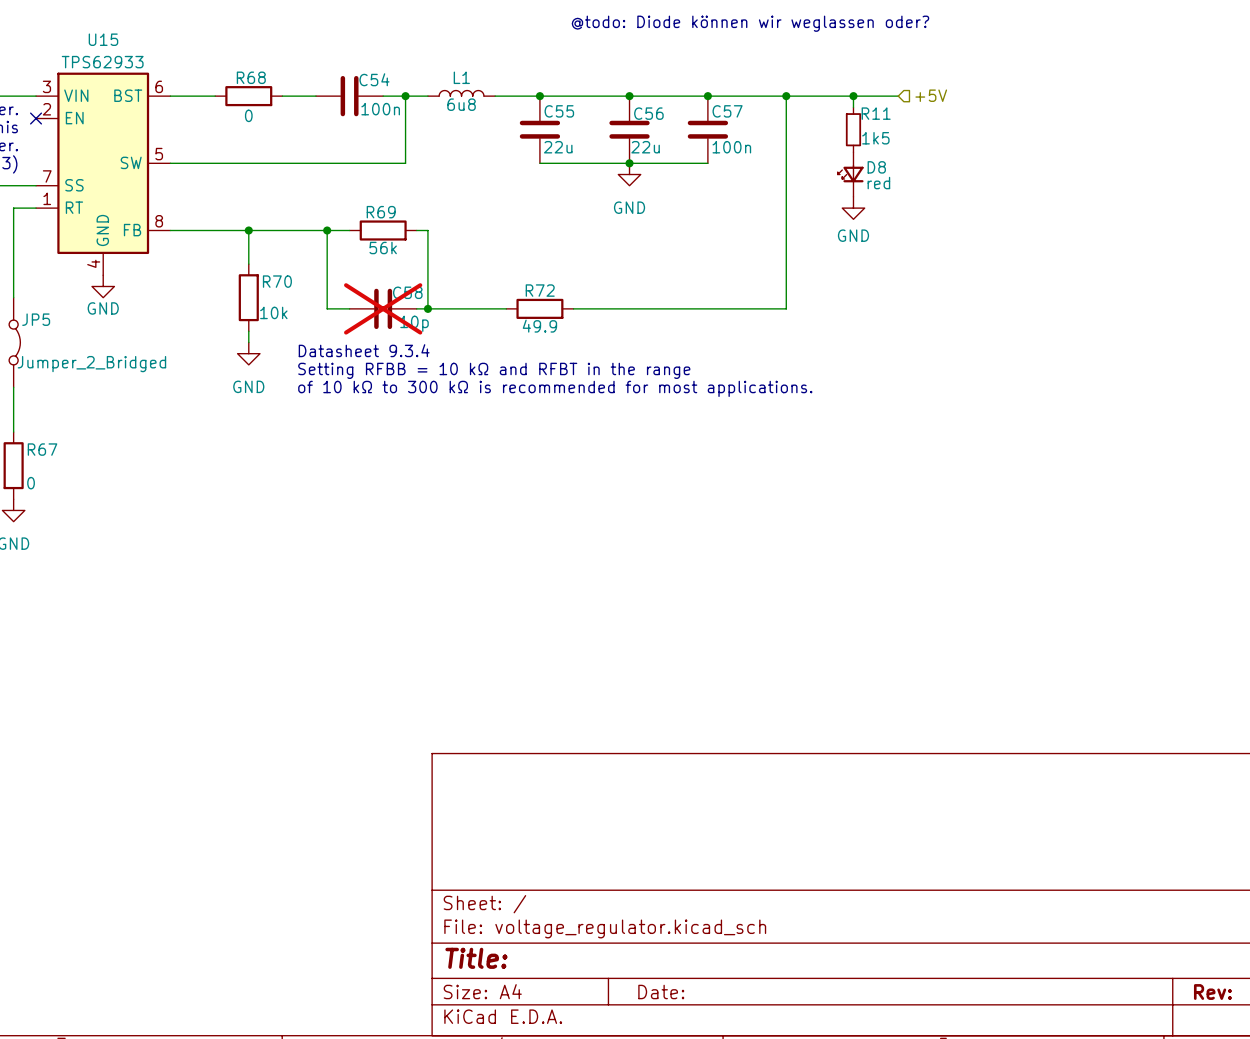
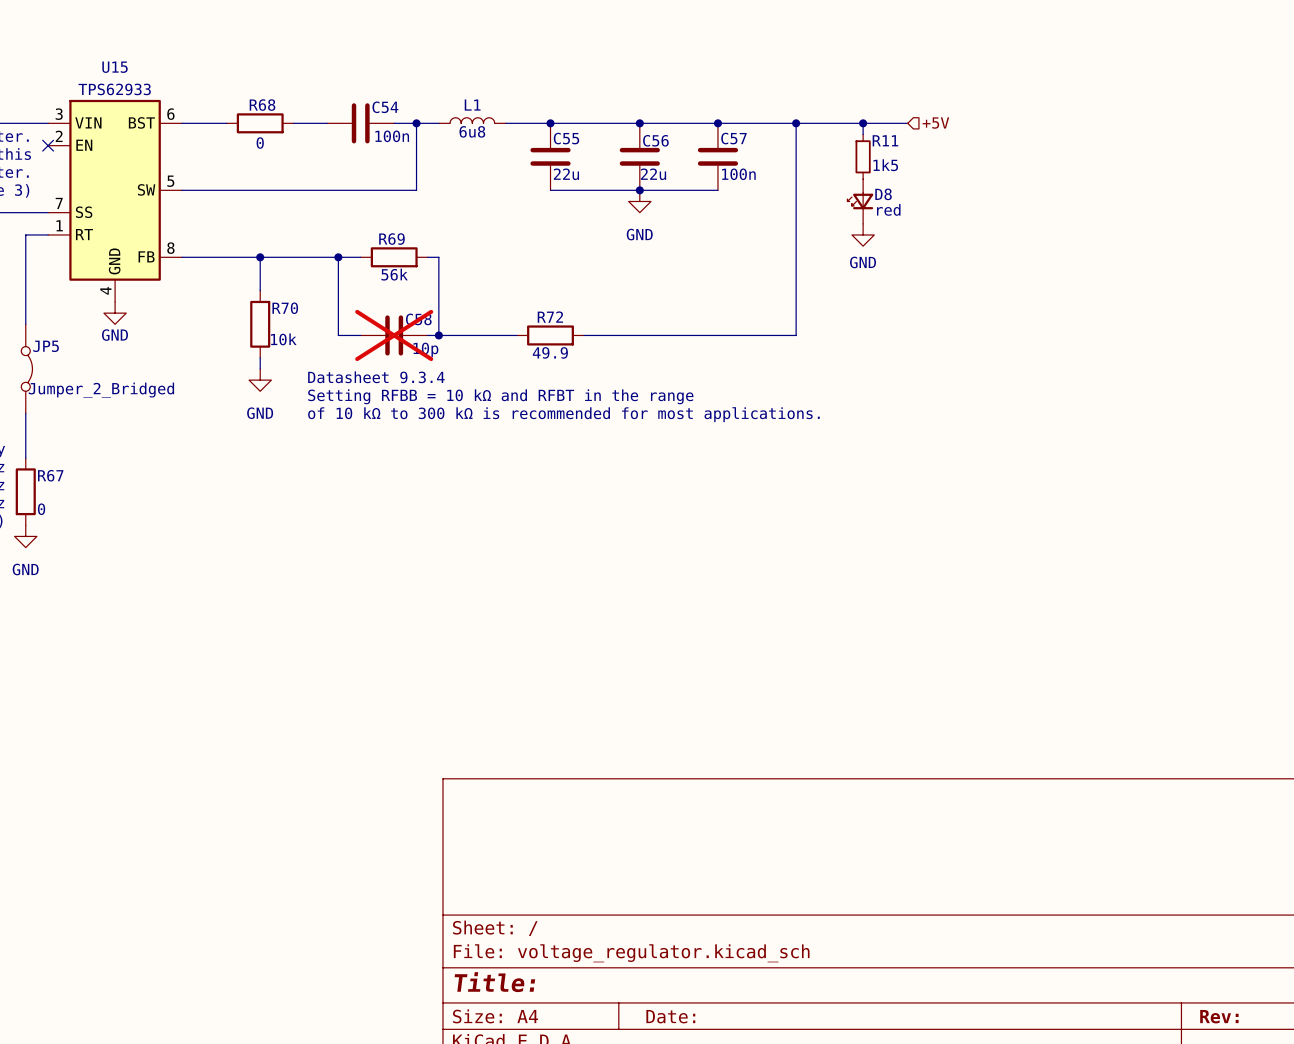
text: @todo: Diode können wir weglassen oder? (750, 23) -> none

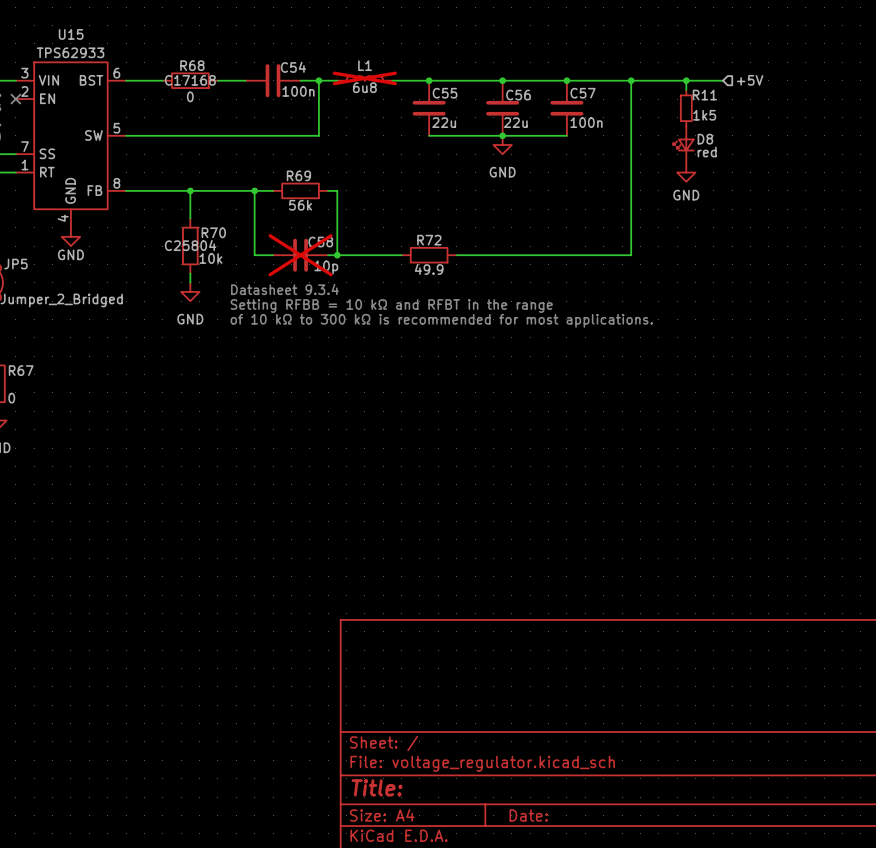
L1 do-not-place cross: none -> (364, 78)
R68 text: none -> C17168 (190, 80)
R70 text: none -> C25804 (190, 245)

